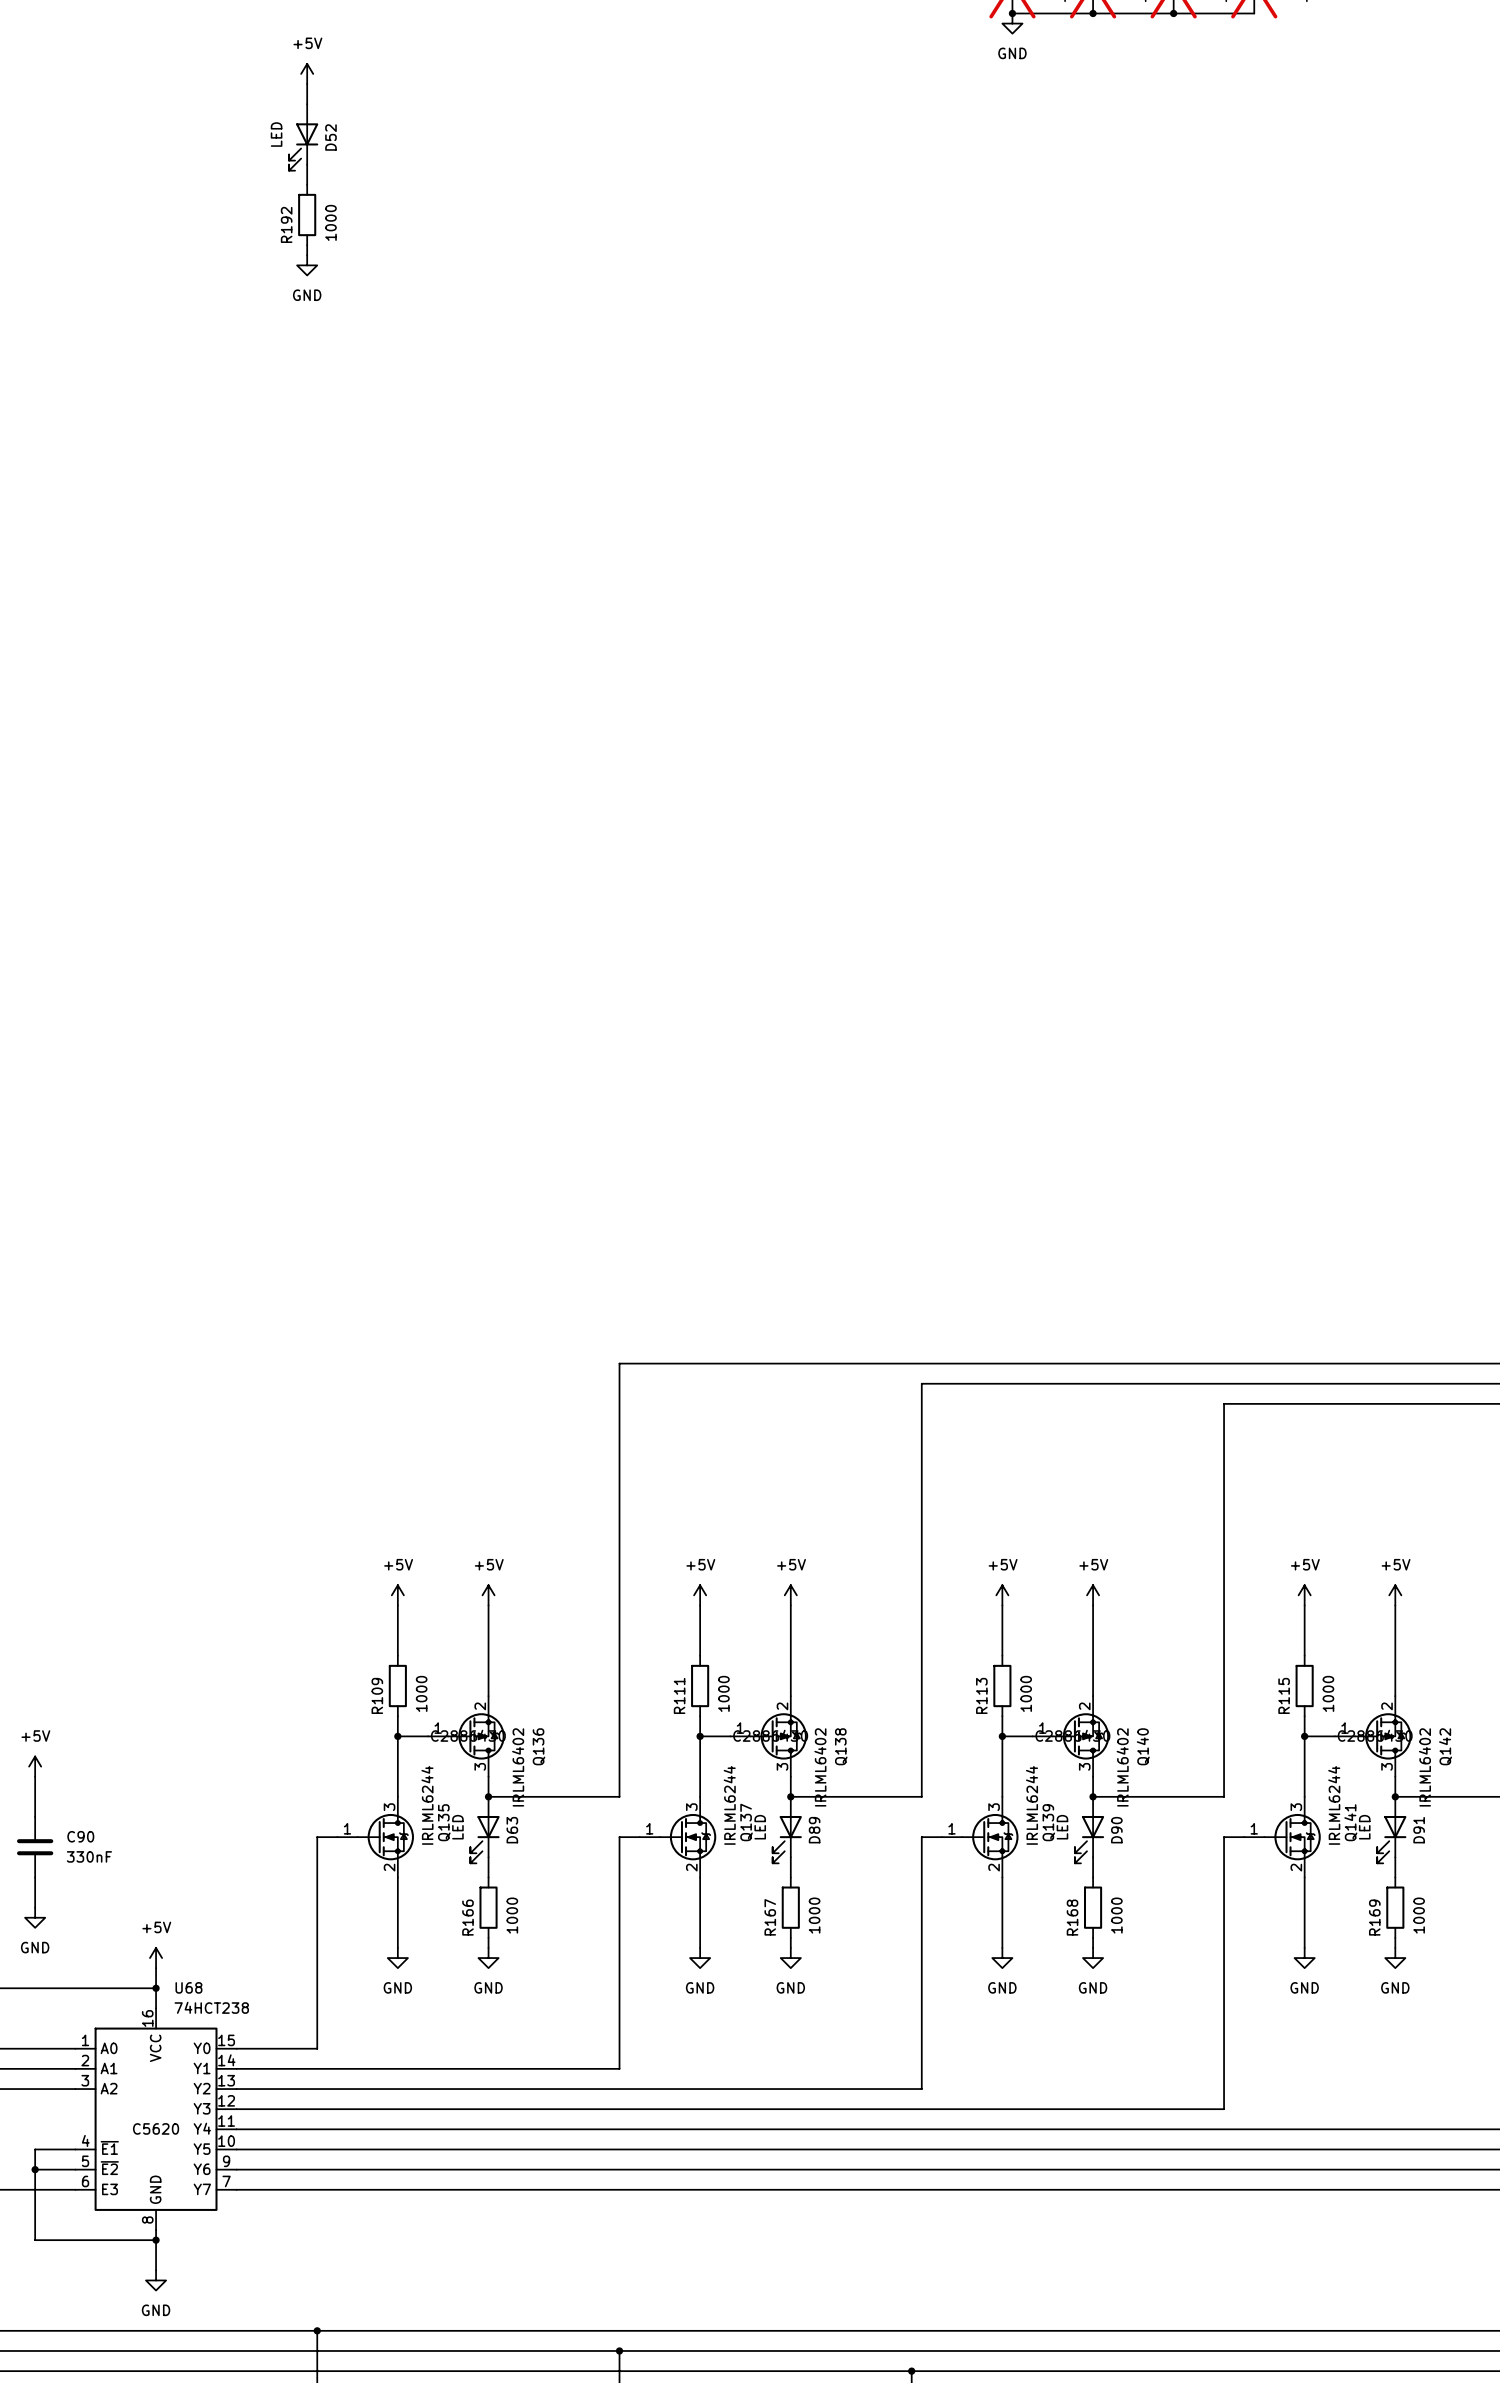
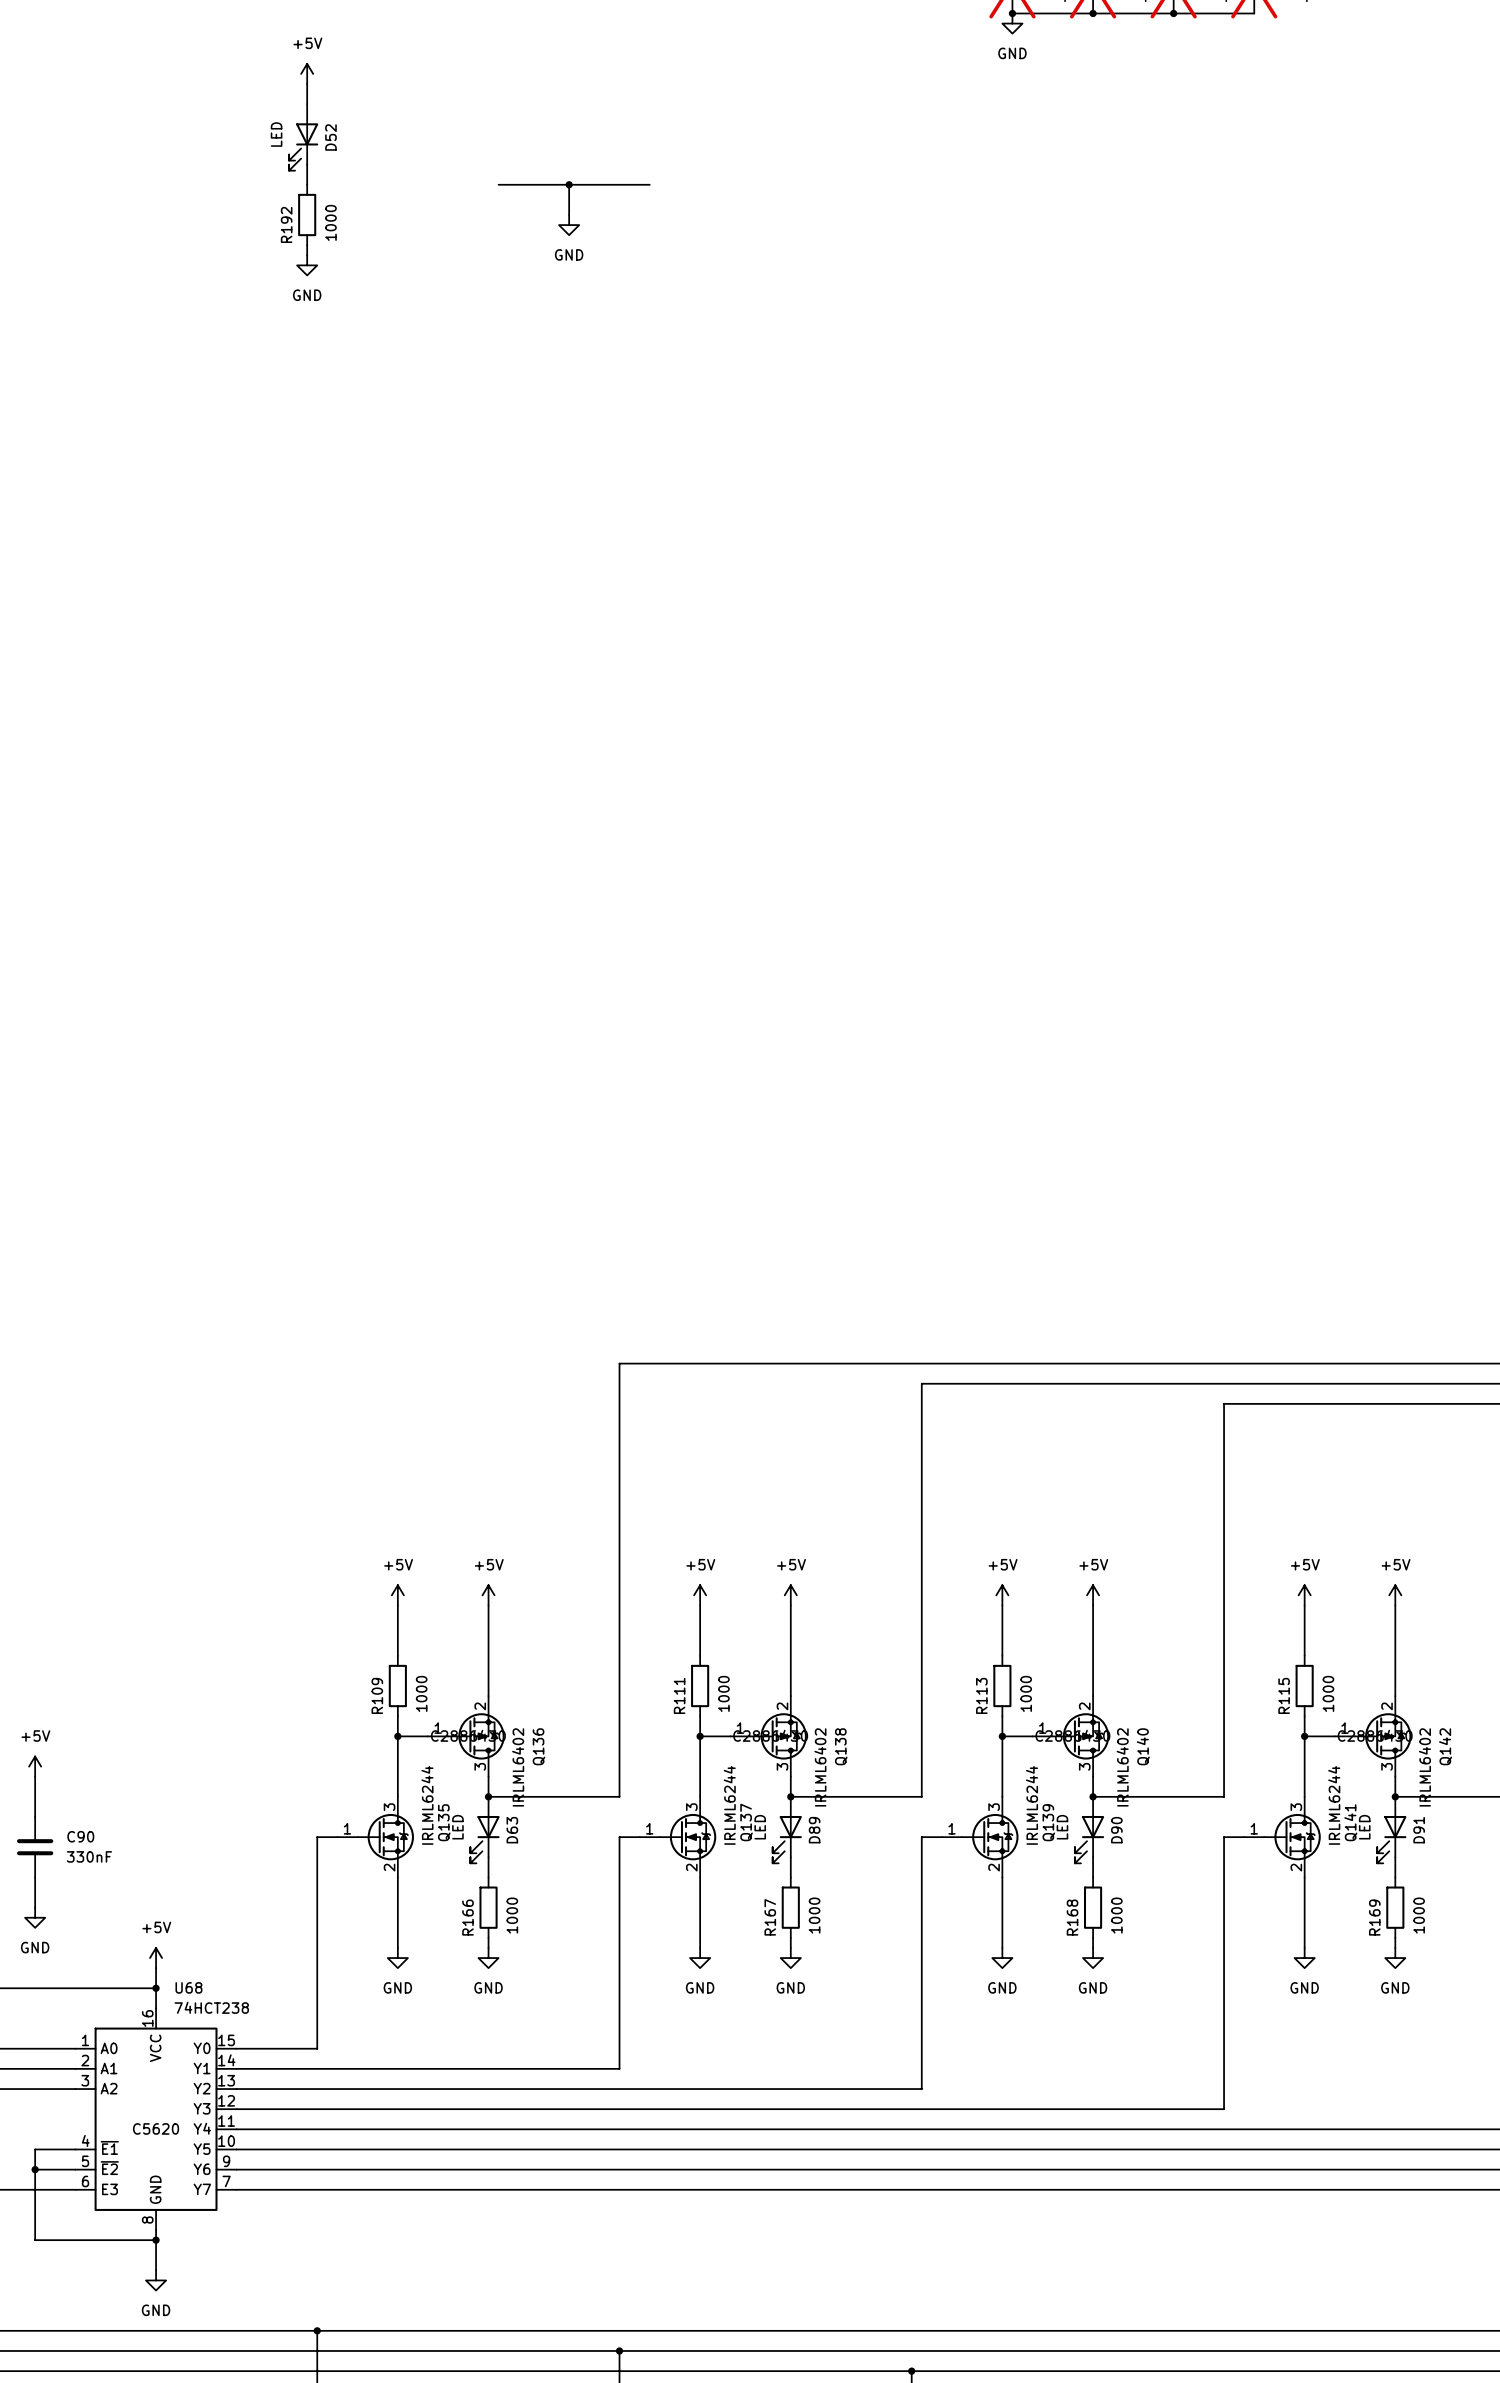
wire: none -> (498, 184) (649, 184)
wire: none -> (569, 184) (569, 215)
junction: none -> (569, 184)
power symbol: none -> GND (569, 225)

